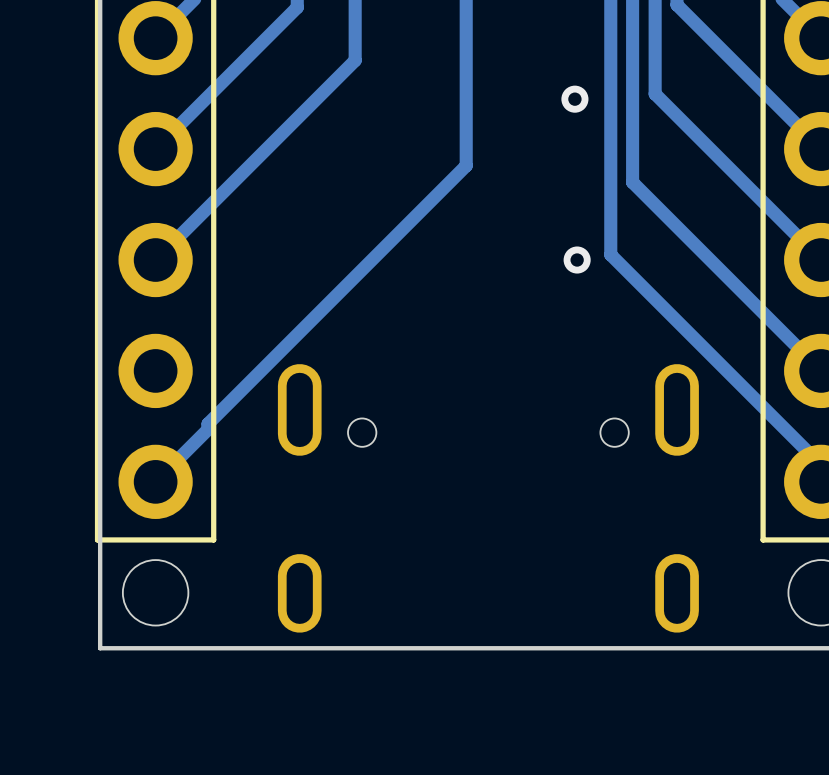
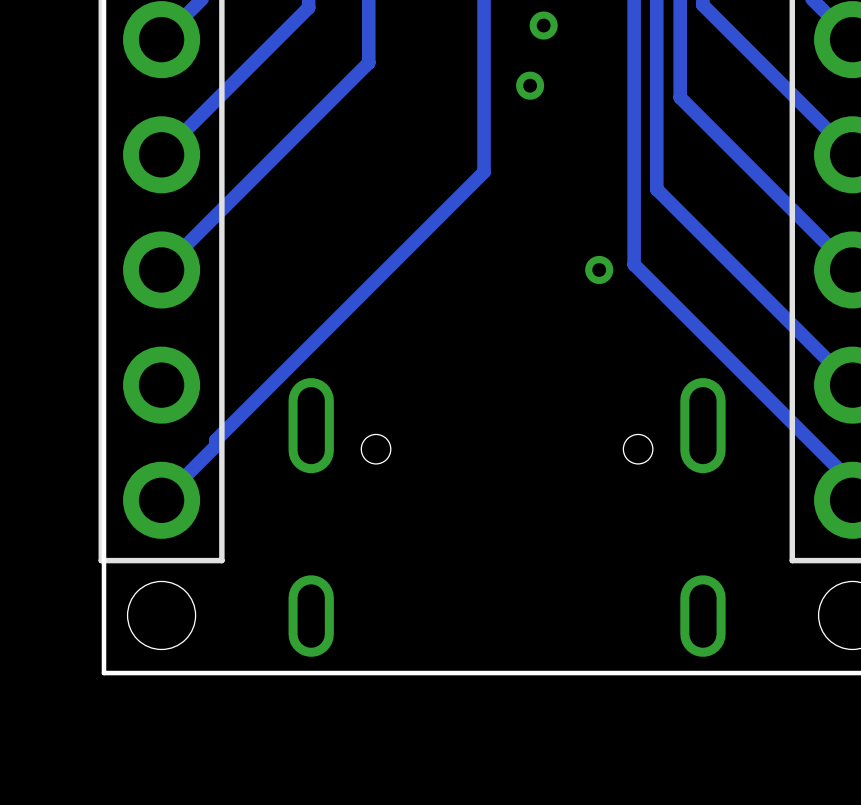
via: none -> (543, 25)
via: none -> (530, 85)
via: (574, 99) -> none

